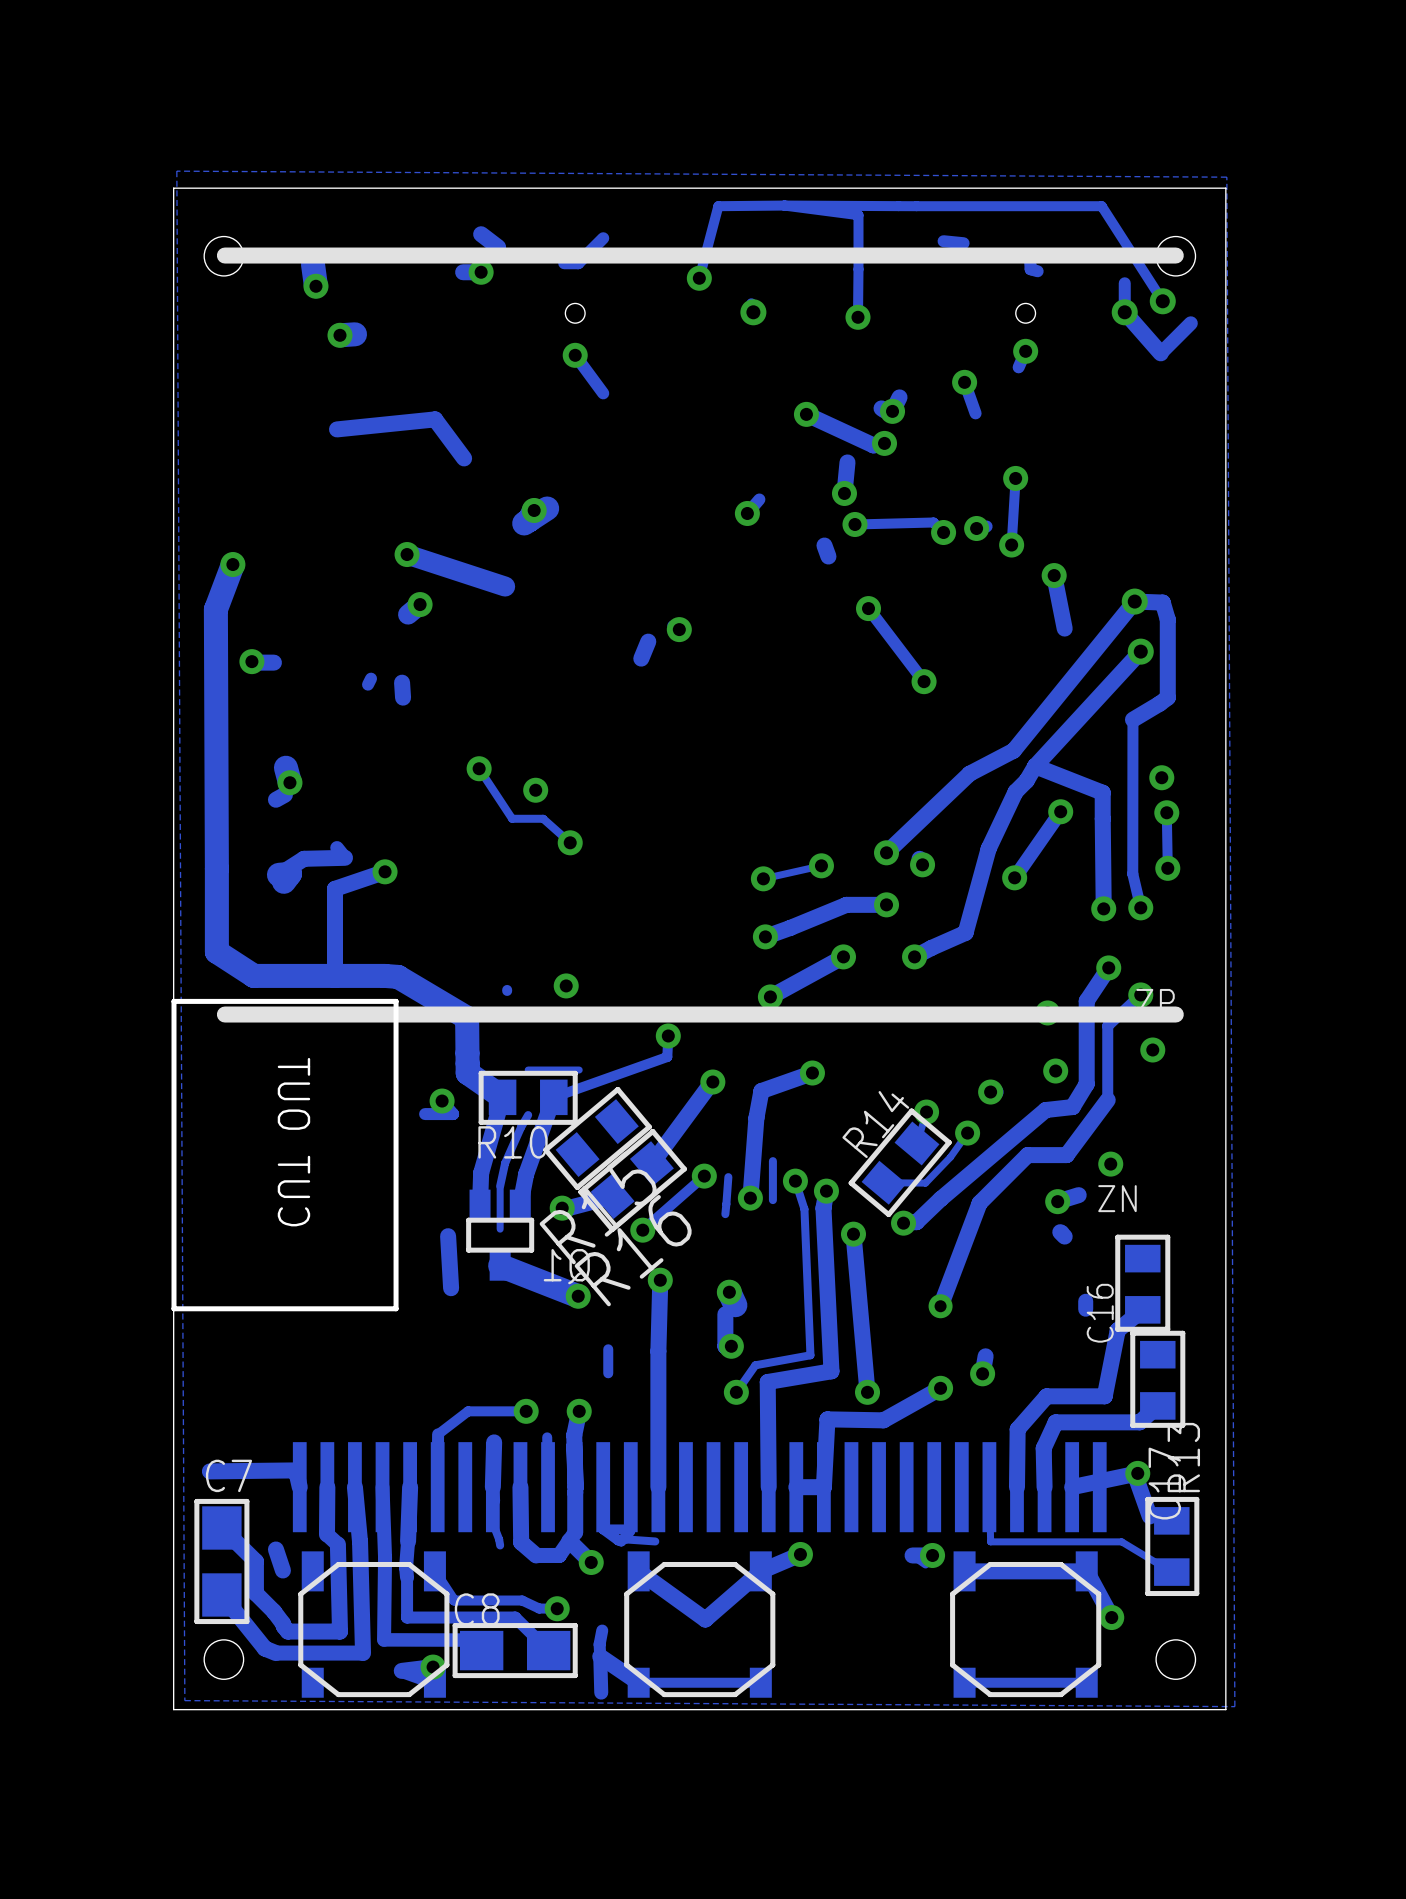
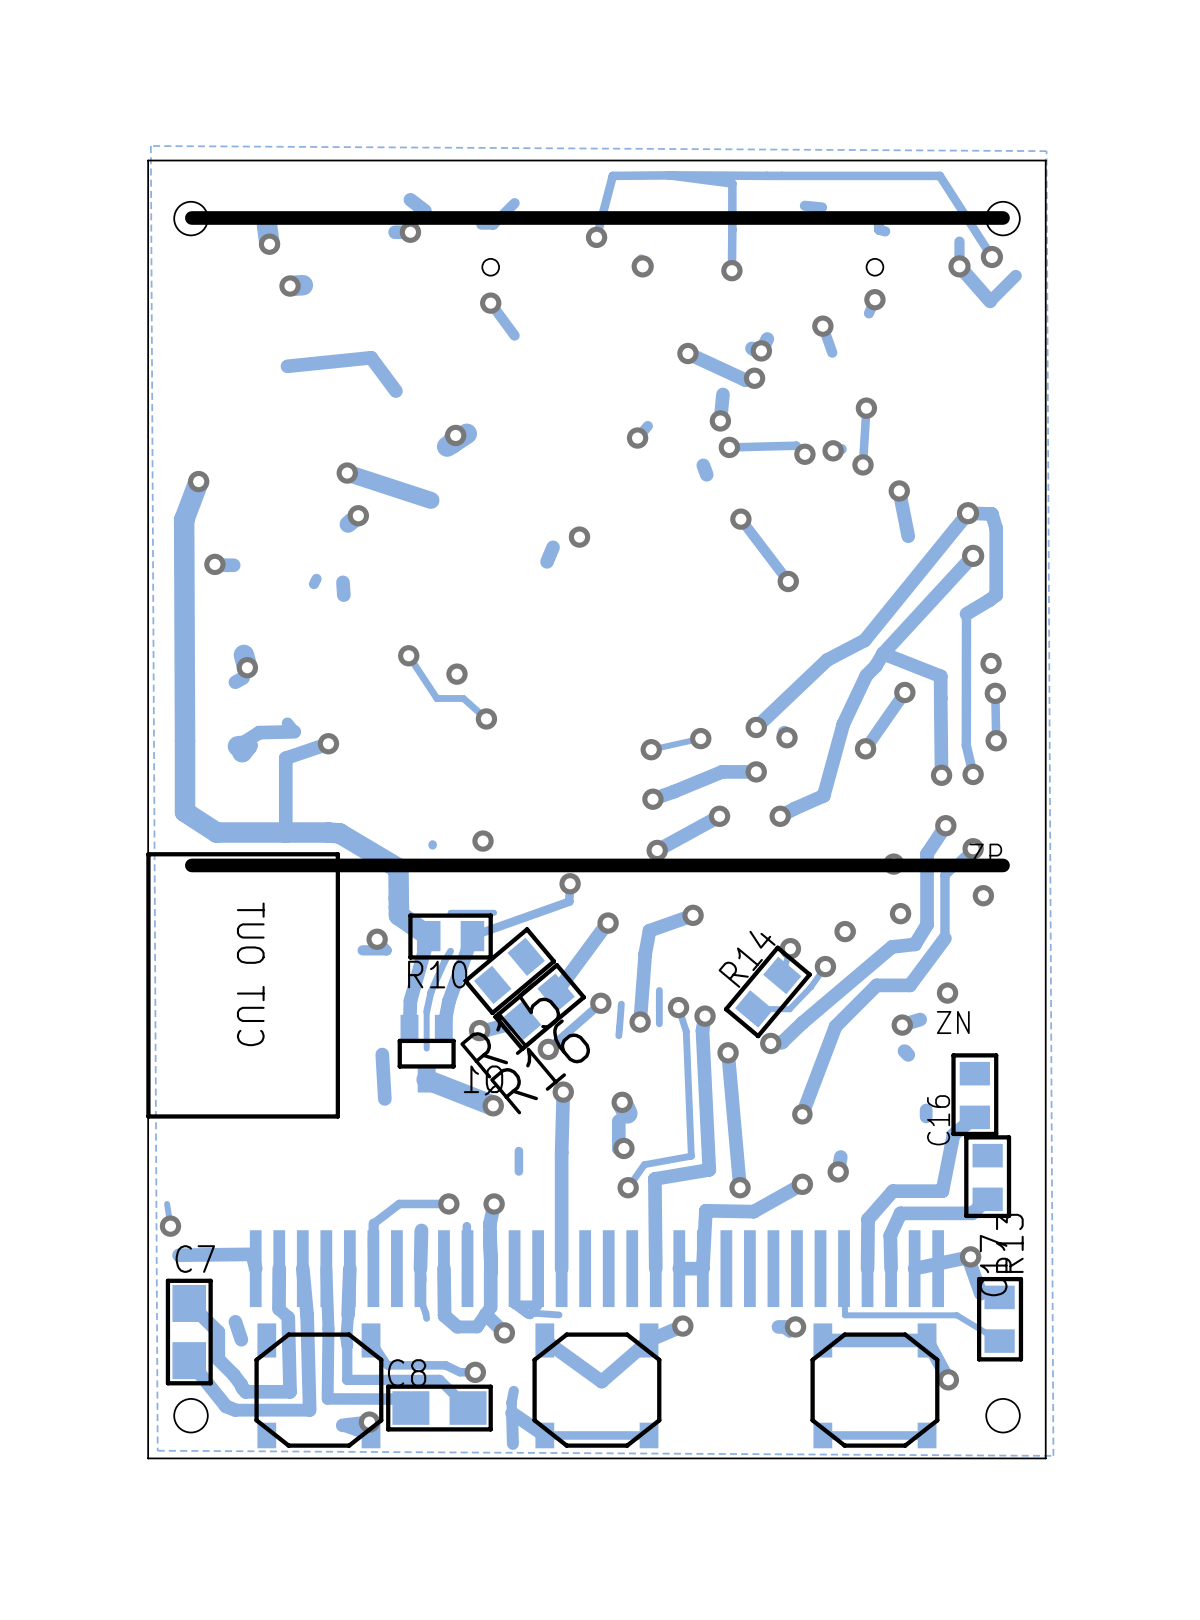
track: none -> (167, 1203) (170, 1226)
via: none -> (170, 1226)

